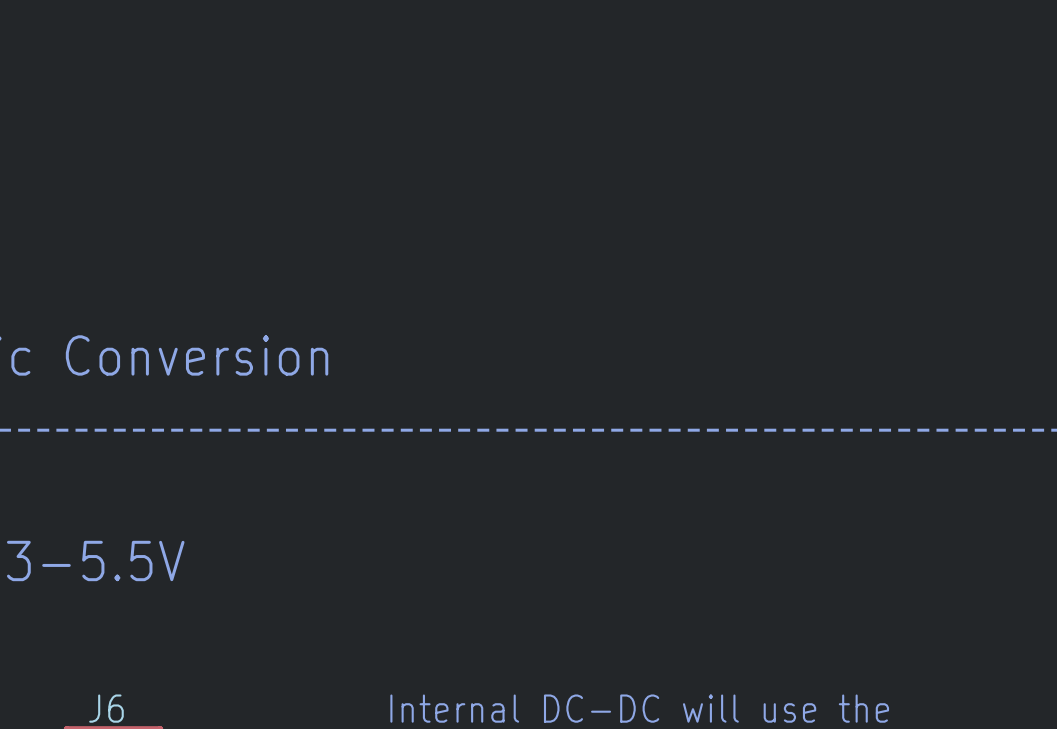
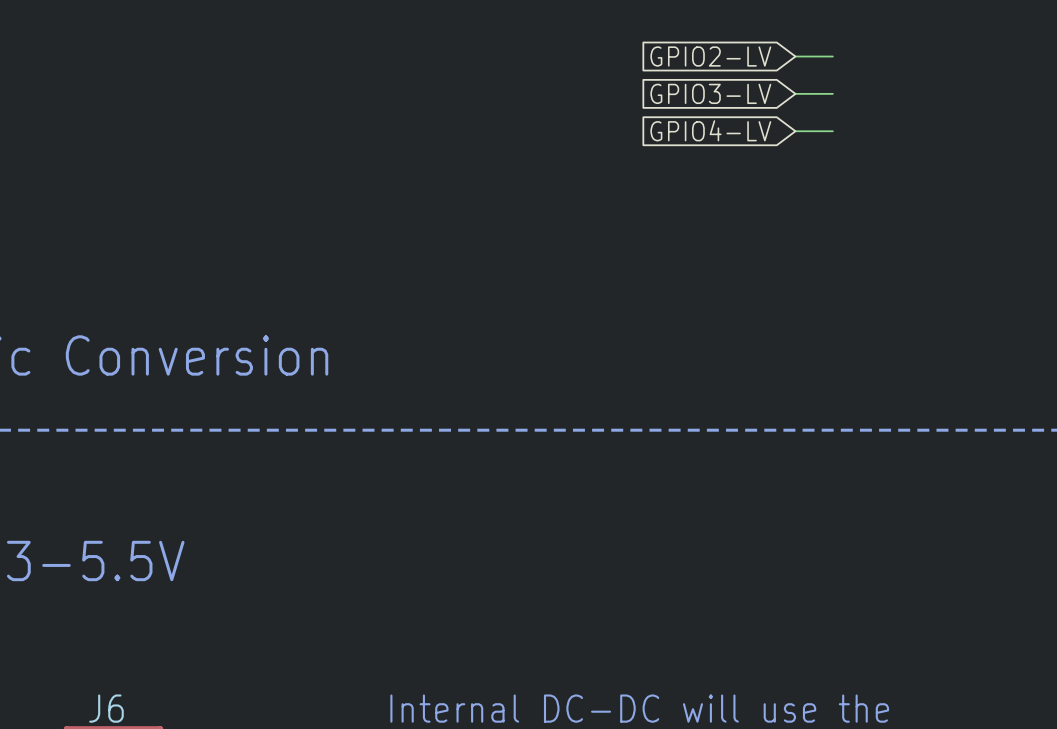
global label: none -> GPIO2-LV (710, 56)
wire: none -> (795, 56) (832, 56)
global label: none -> GPIO3-LV (710, 93)
wire: none -> (795, 93) (832, 93)
global label: none -> GPIO4-LV (710, 130)
wire: none -> (795, 131) (832, 131)

